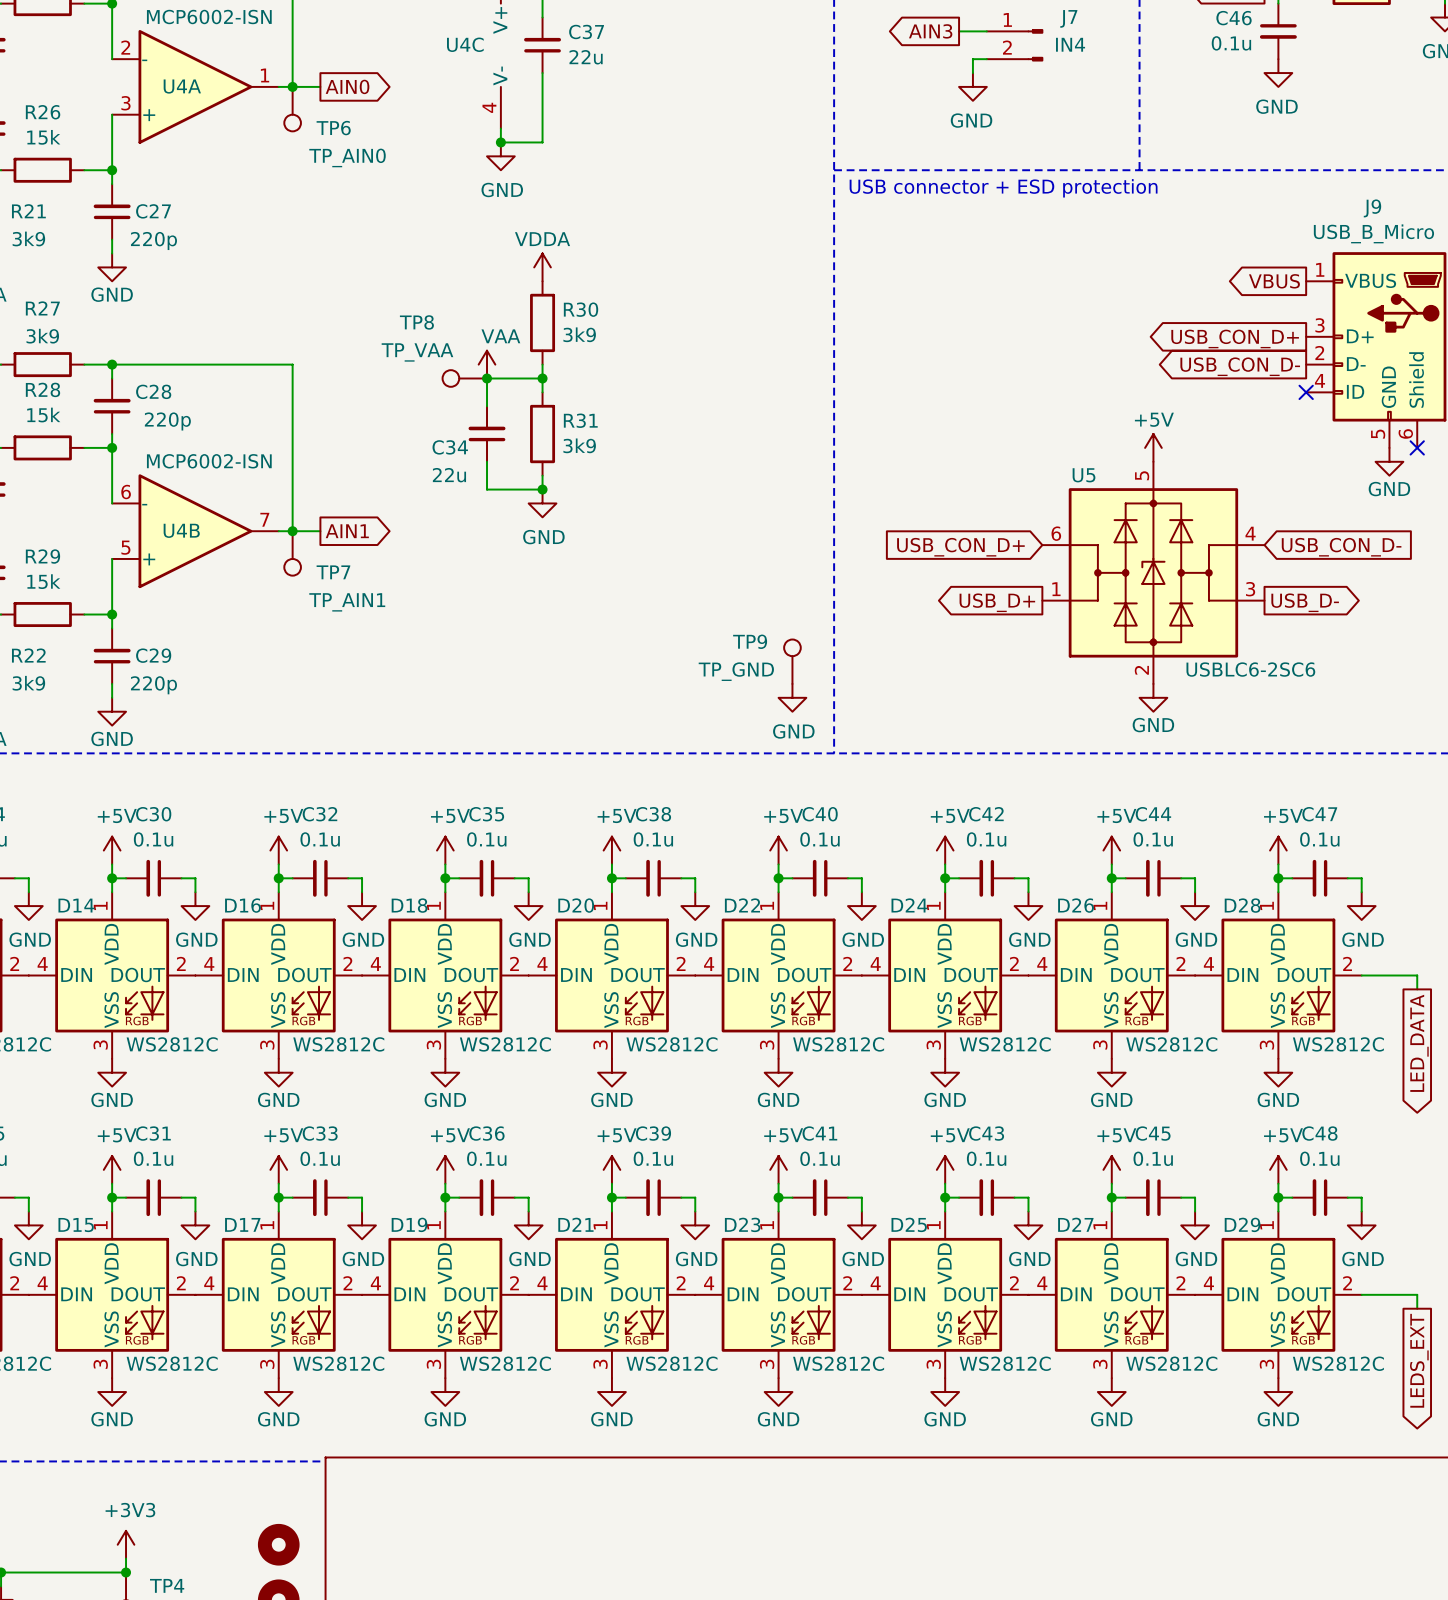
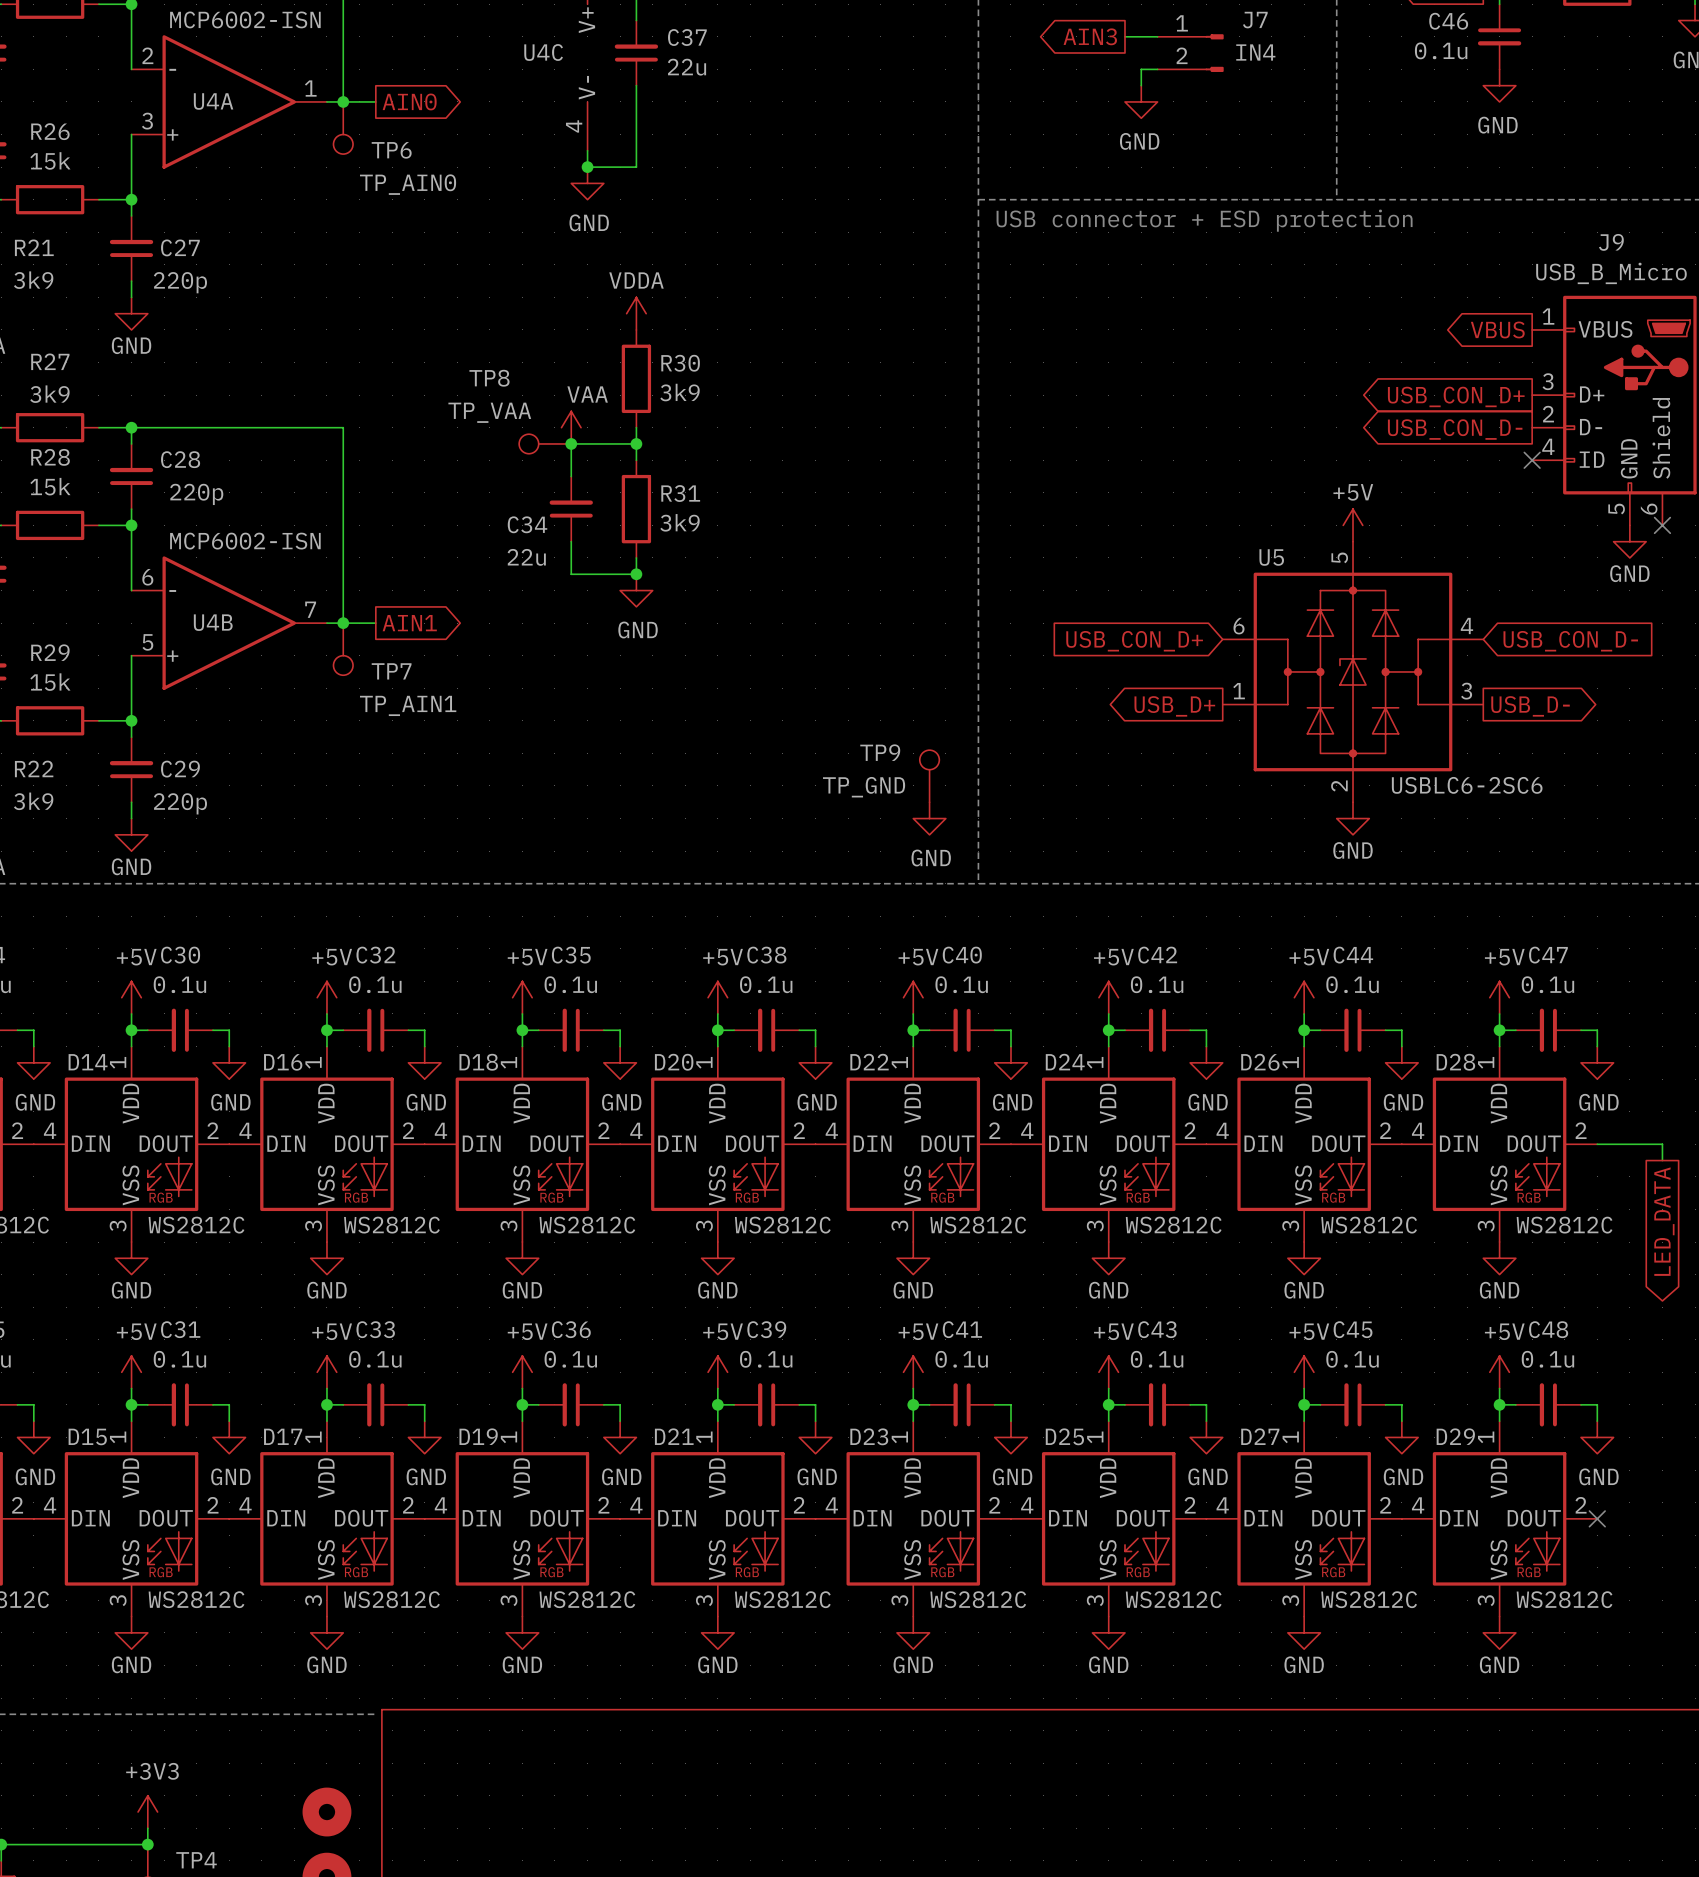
wire: (1361, 1294) (1417, 1294) (1417, 1308) -> none
no-connect mark: none -> (1597, 1518)
global label: LEDS_EXT (1419, 1360) -> none

